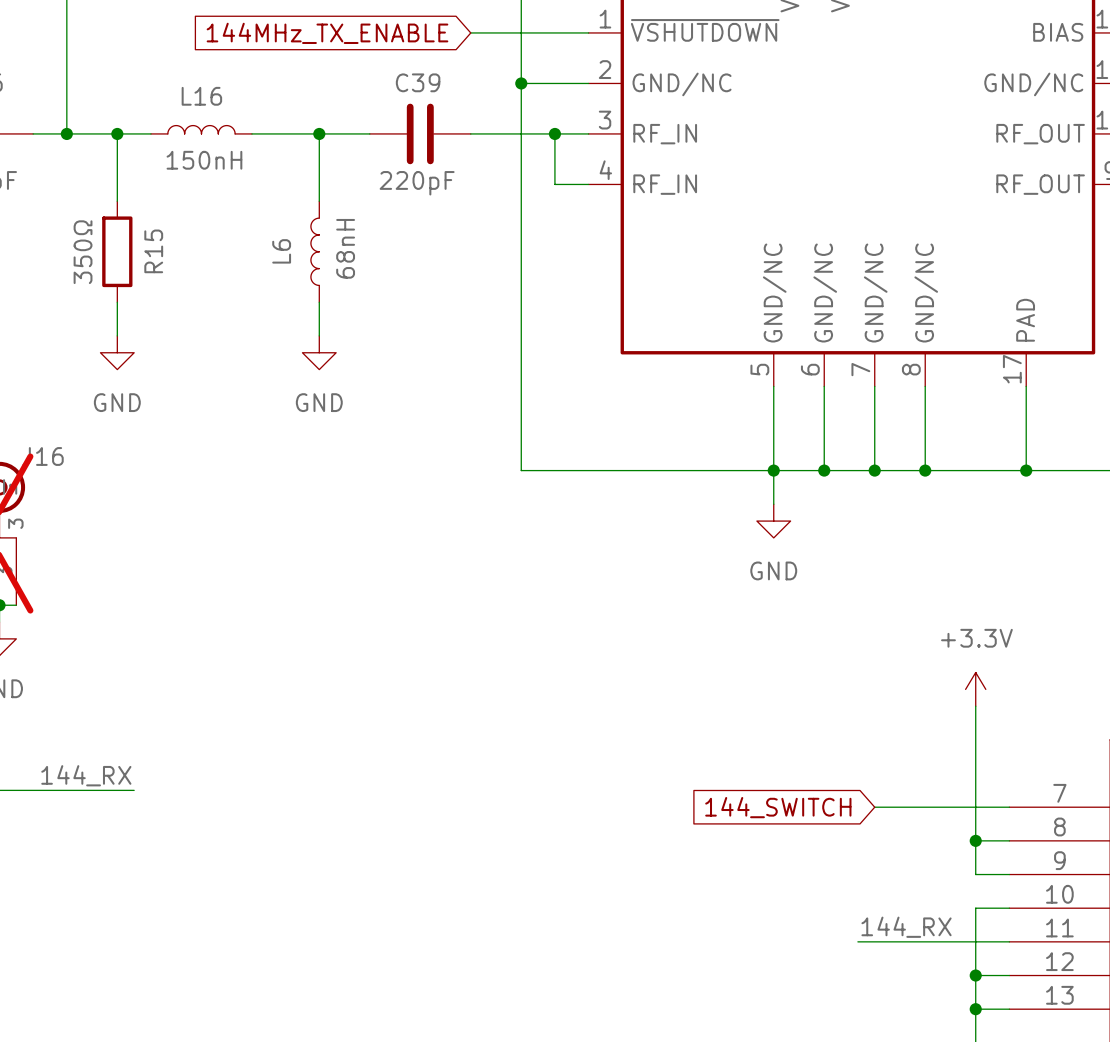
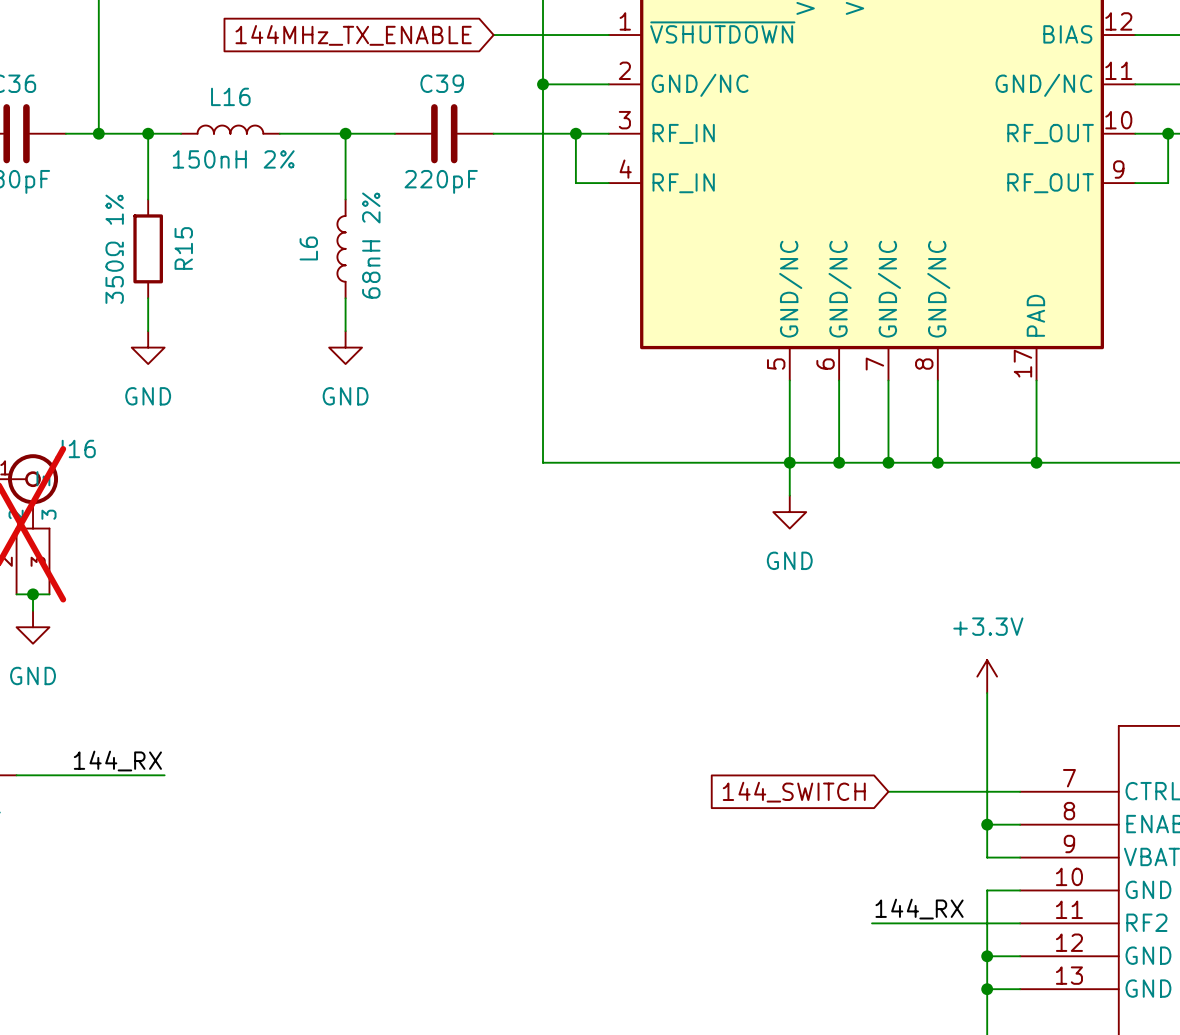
L16 value: 150nH (204, 160) -> 150nH 2% (233, 159)
L6 value: 68nH (345, 248) -> 68nH 2% (371, 245)
R15 value: 350Ω (83, 252) -> 350Ω 1% (114, 249)

